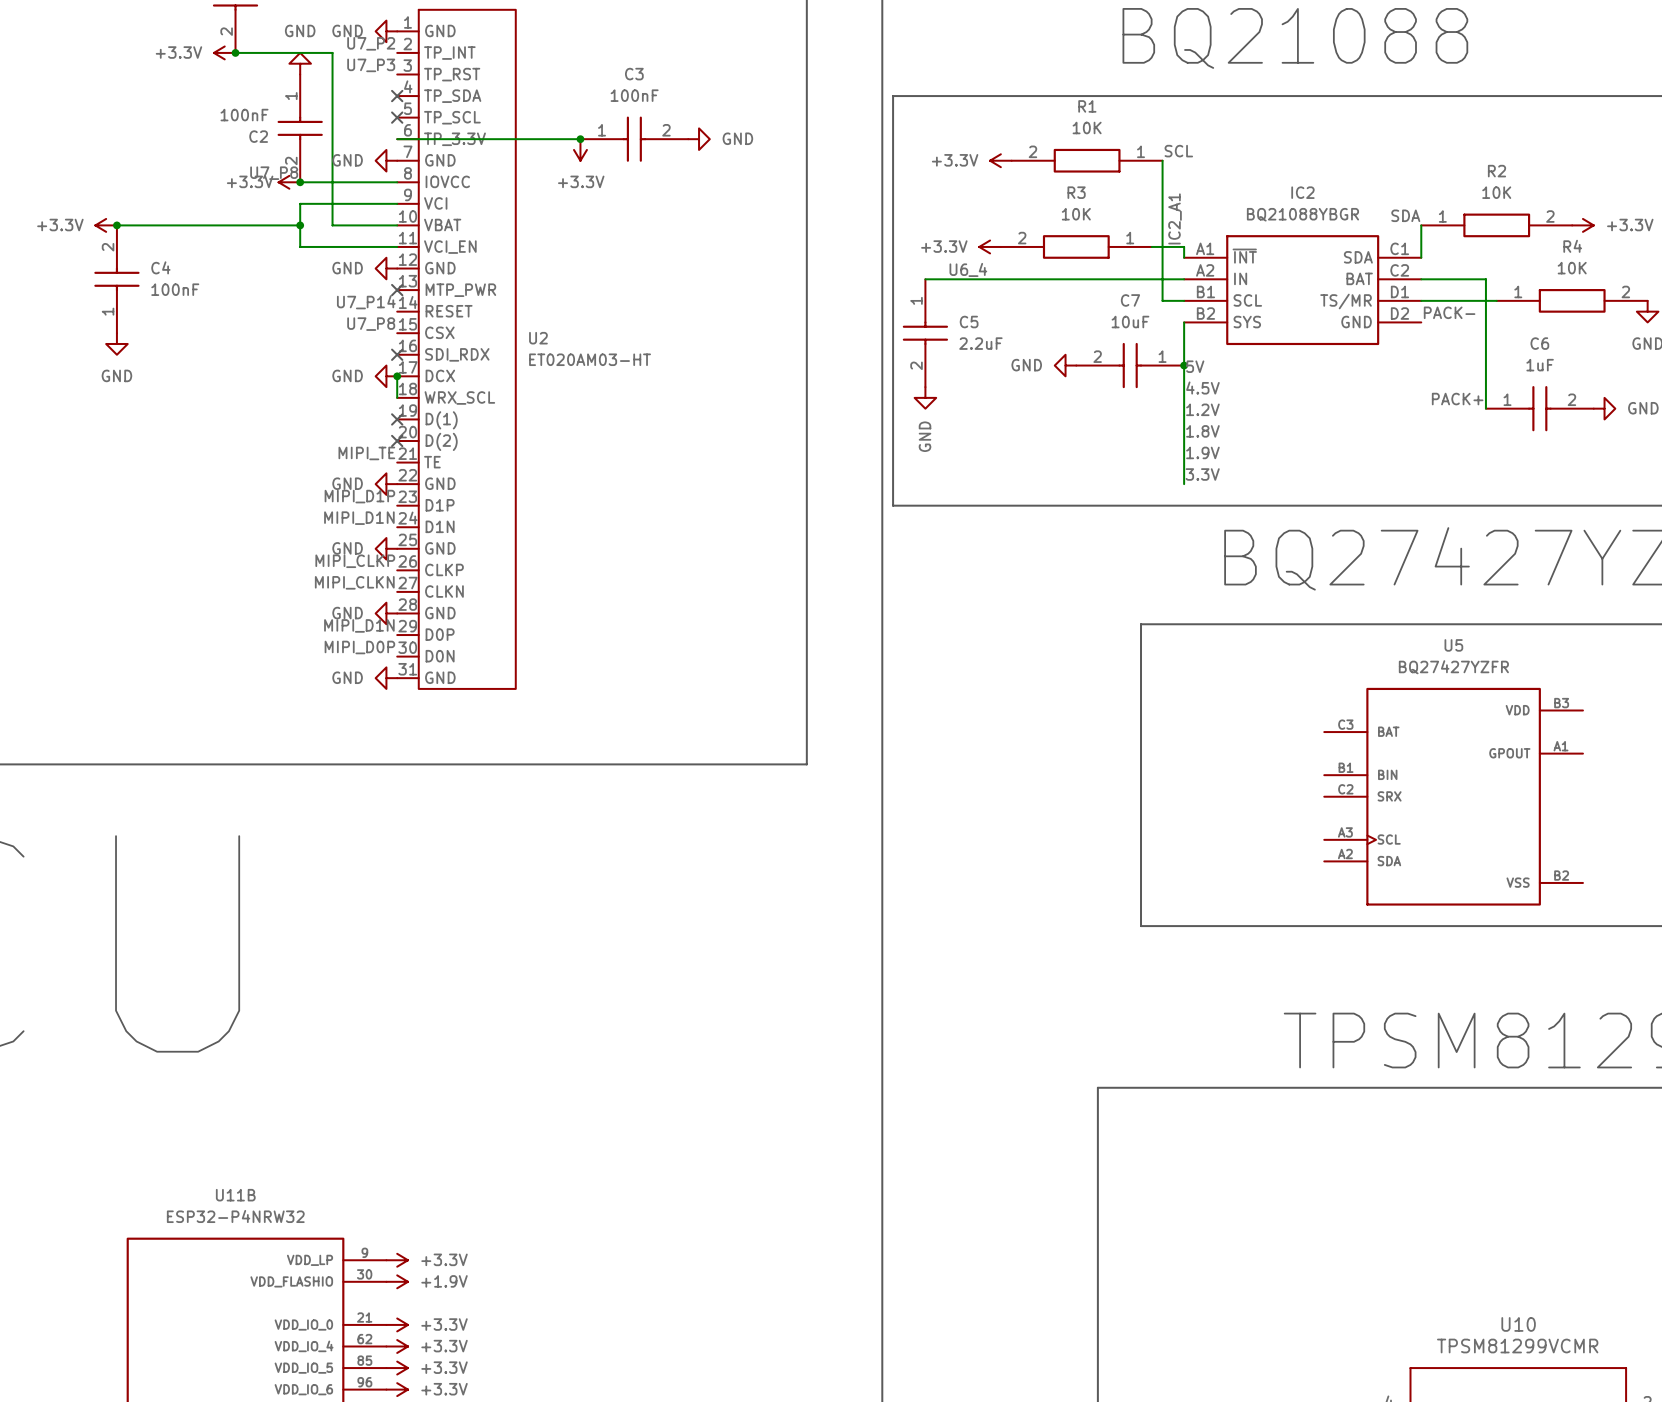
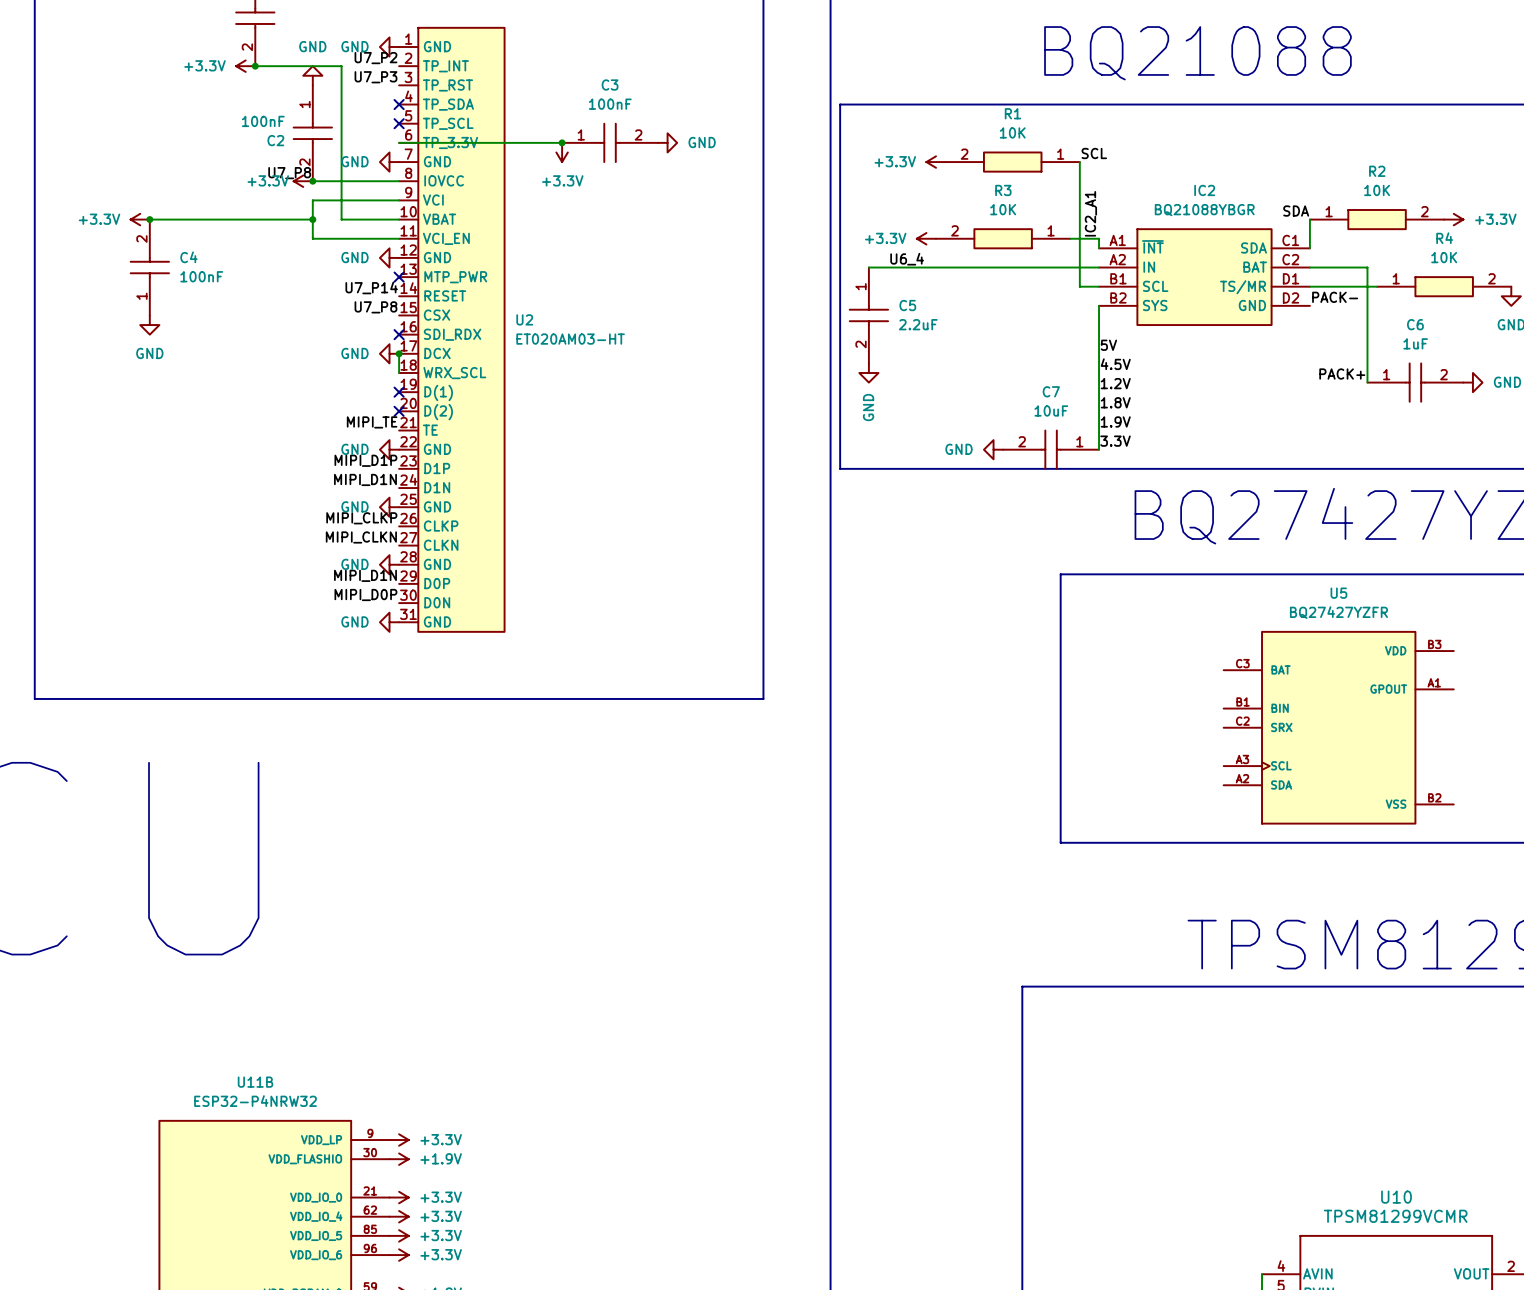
power symbol position: GND (1065, 365) -> GND (993, 449)
C7 position: (1130, 365) -> (1051, 449)
junction: (1184, 365) -> none

